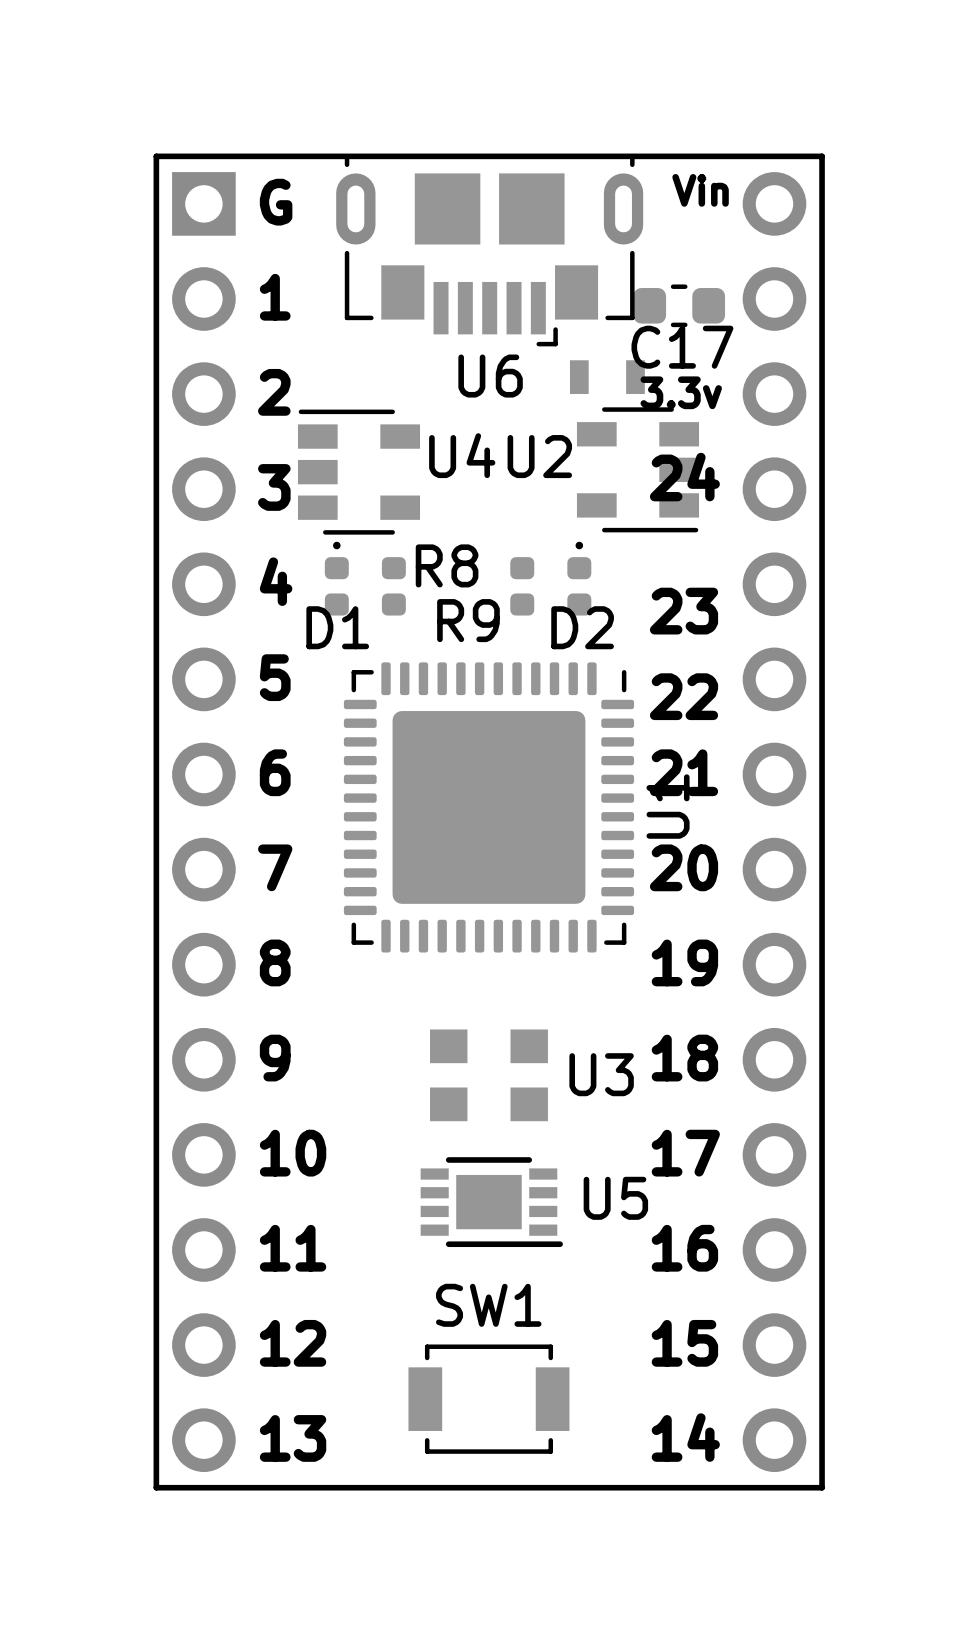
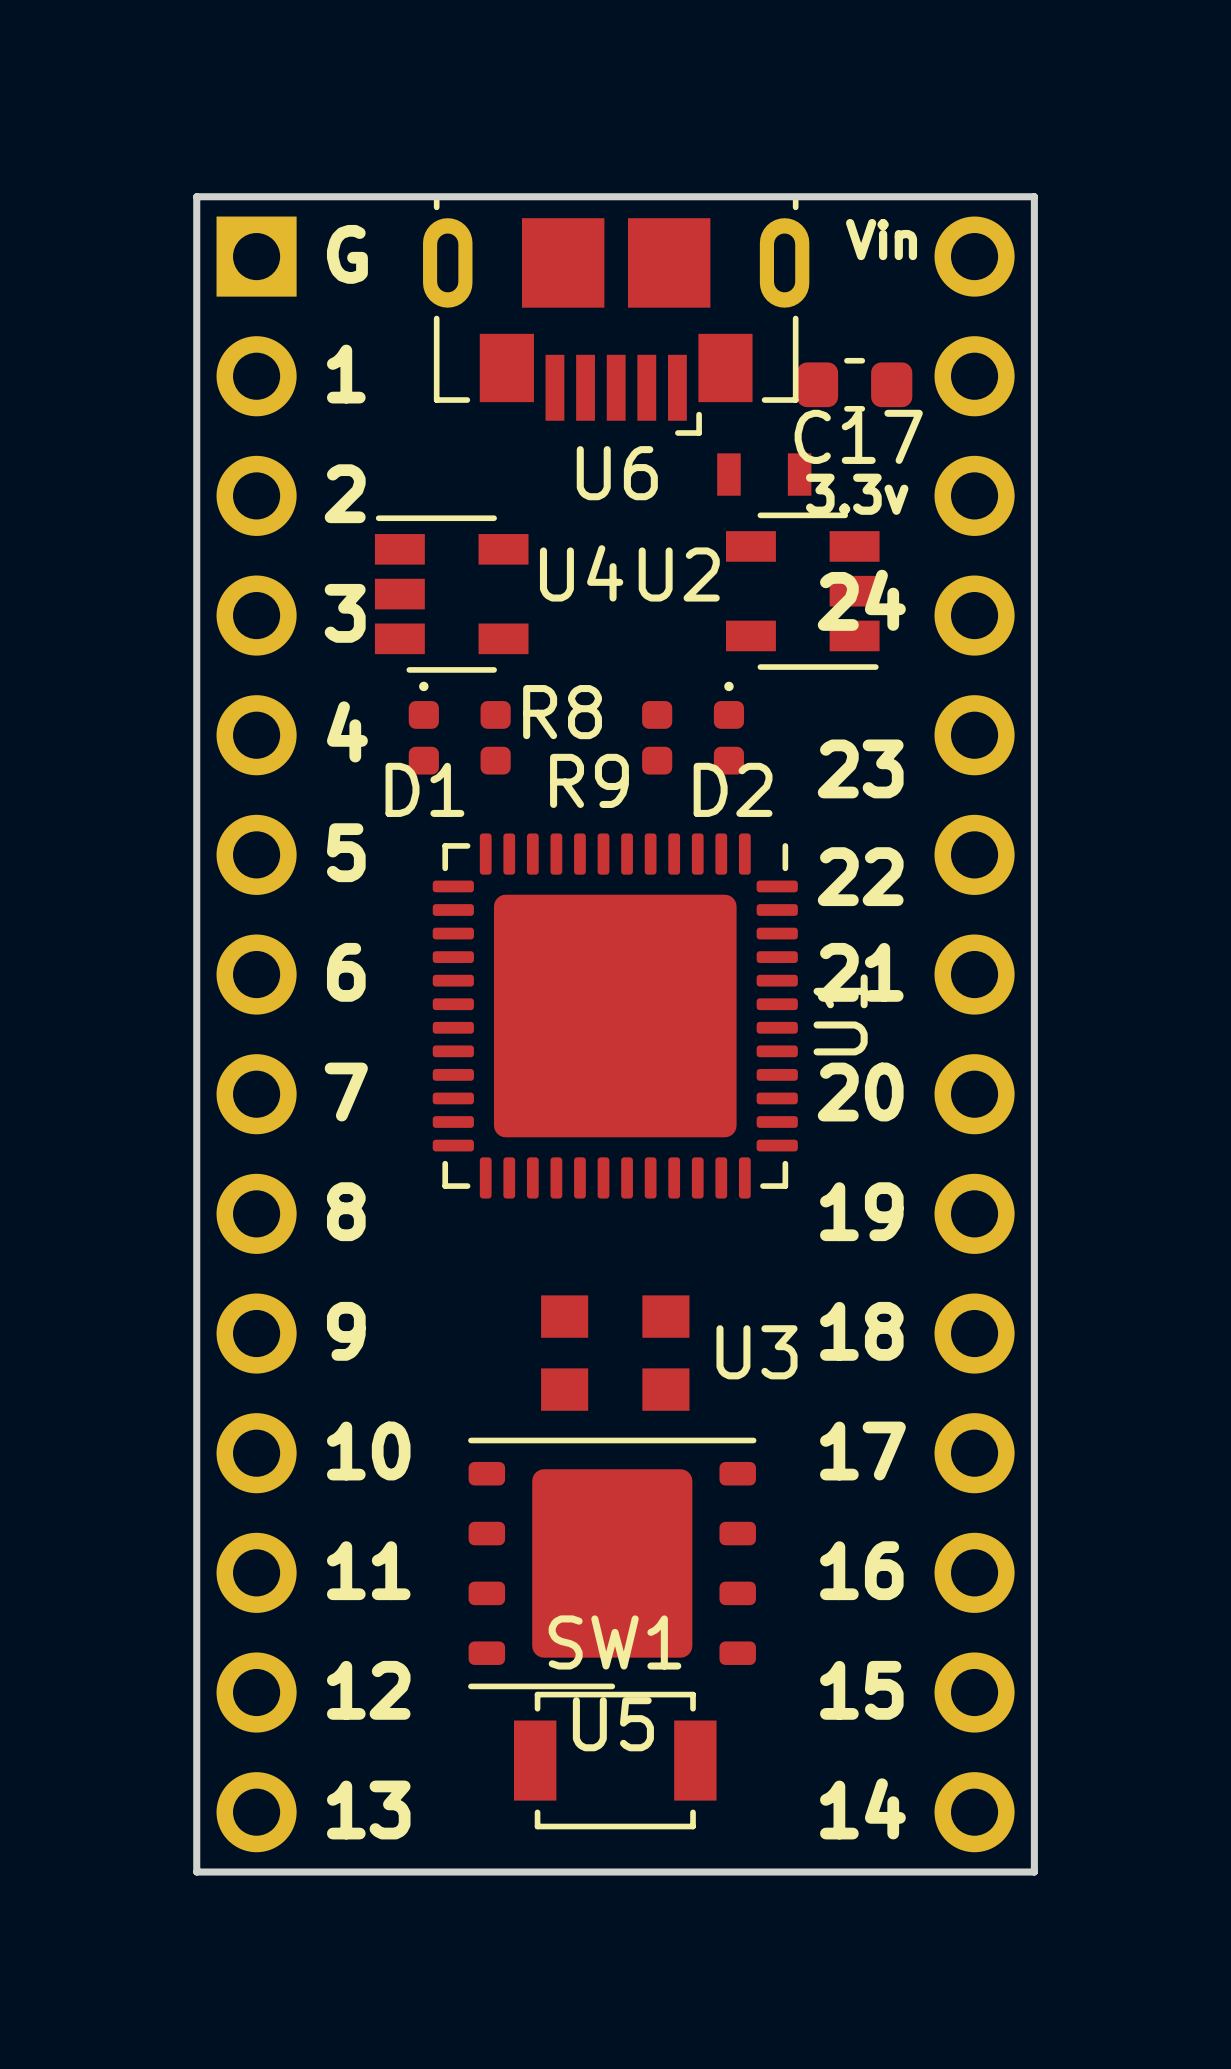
U5 footprint: [420, 1157, 563, 1248] -> [468, 1437, 757, 1690]
U5 name position: U5 (615, 1198) -> U5 (613, 1724)

